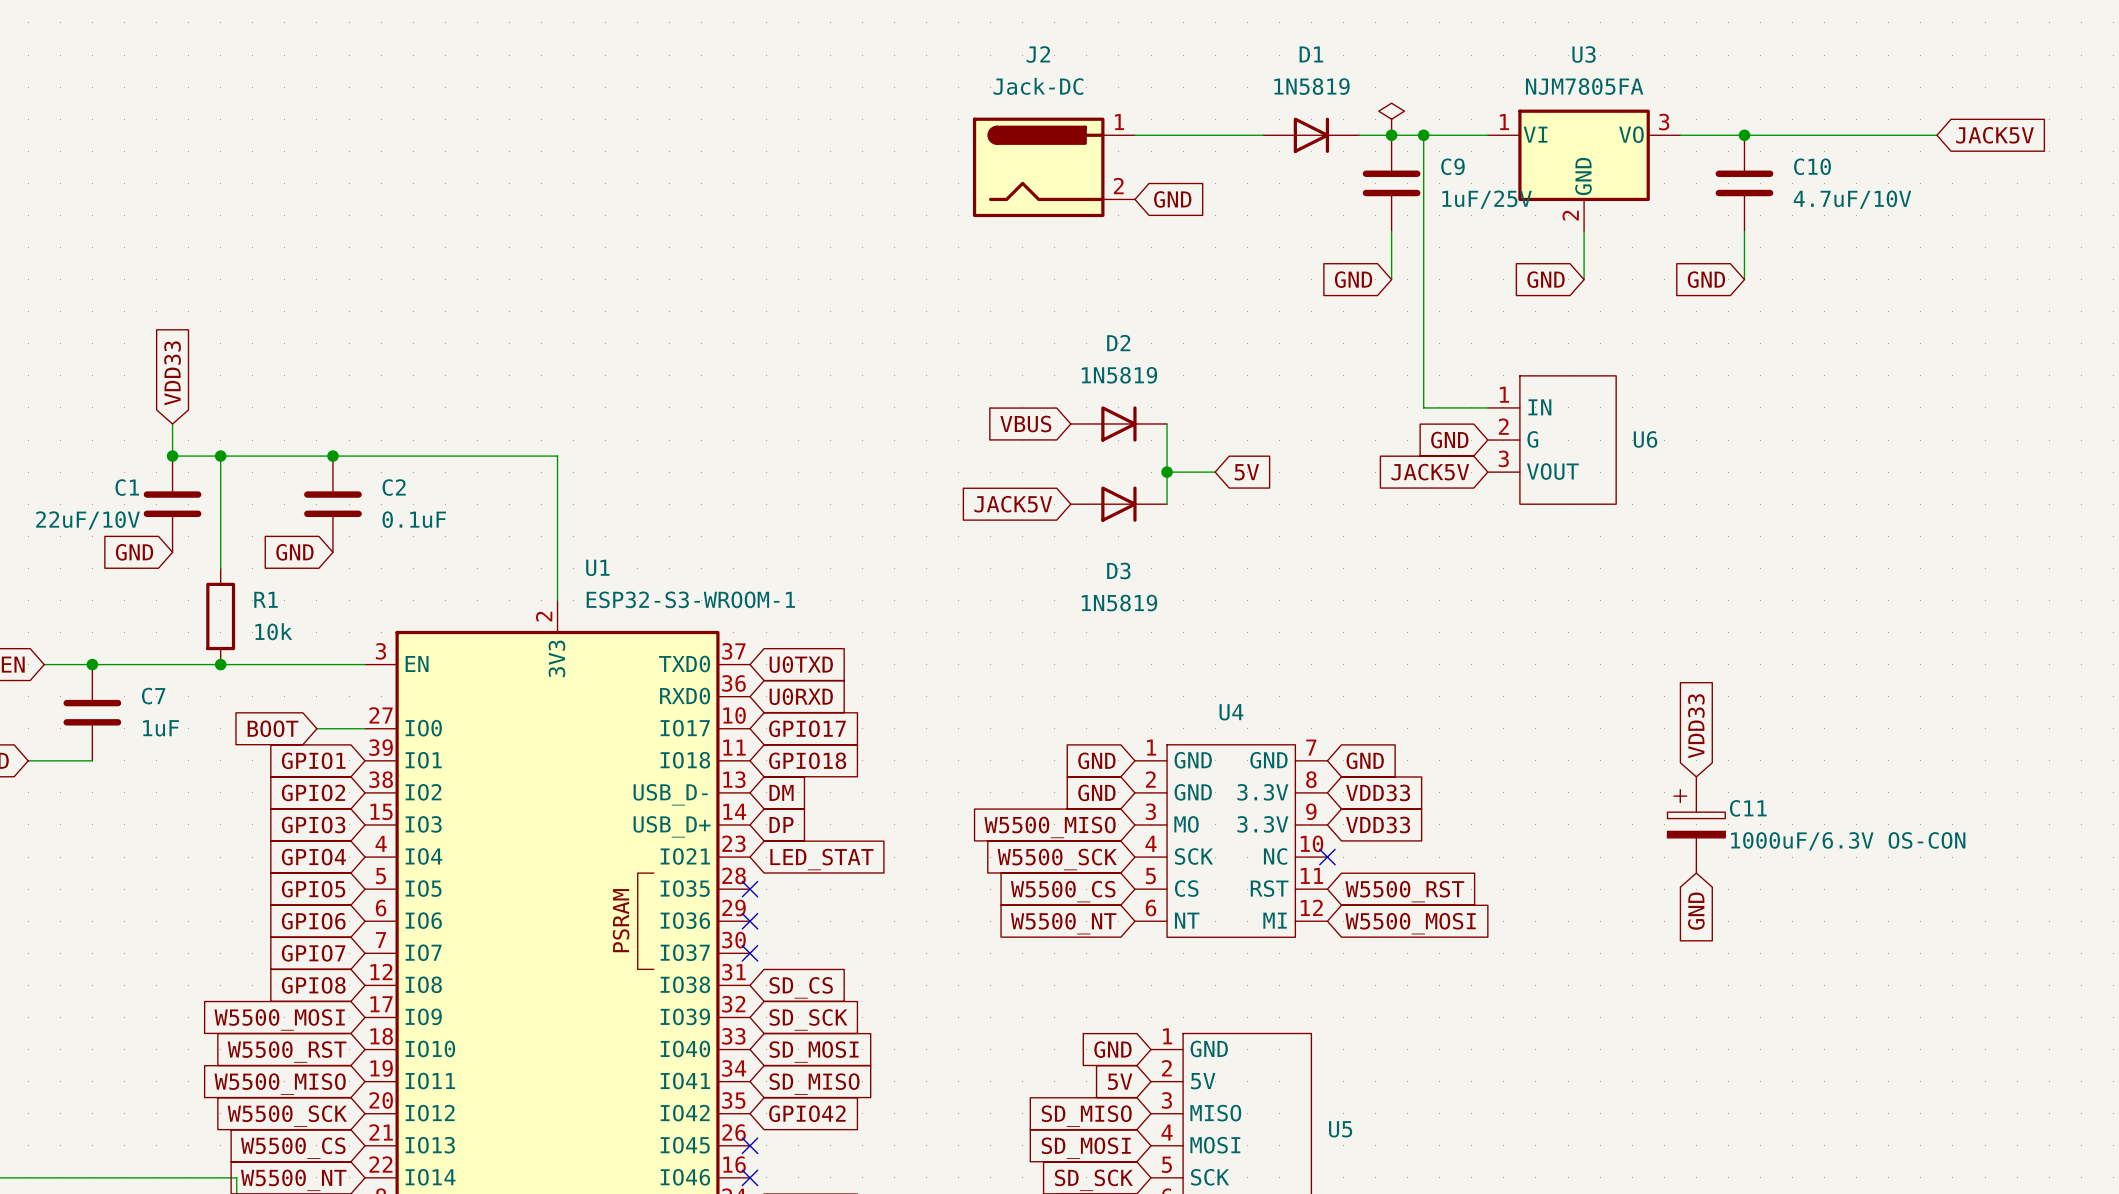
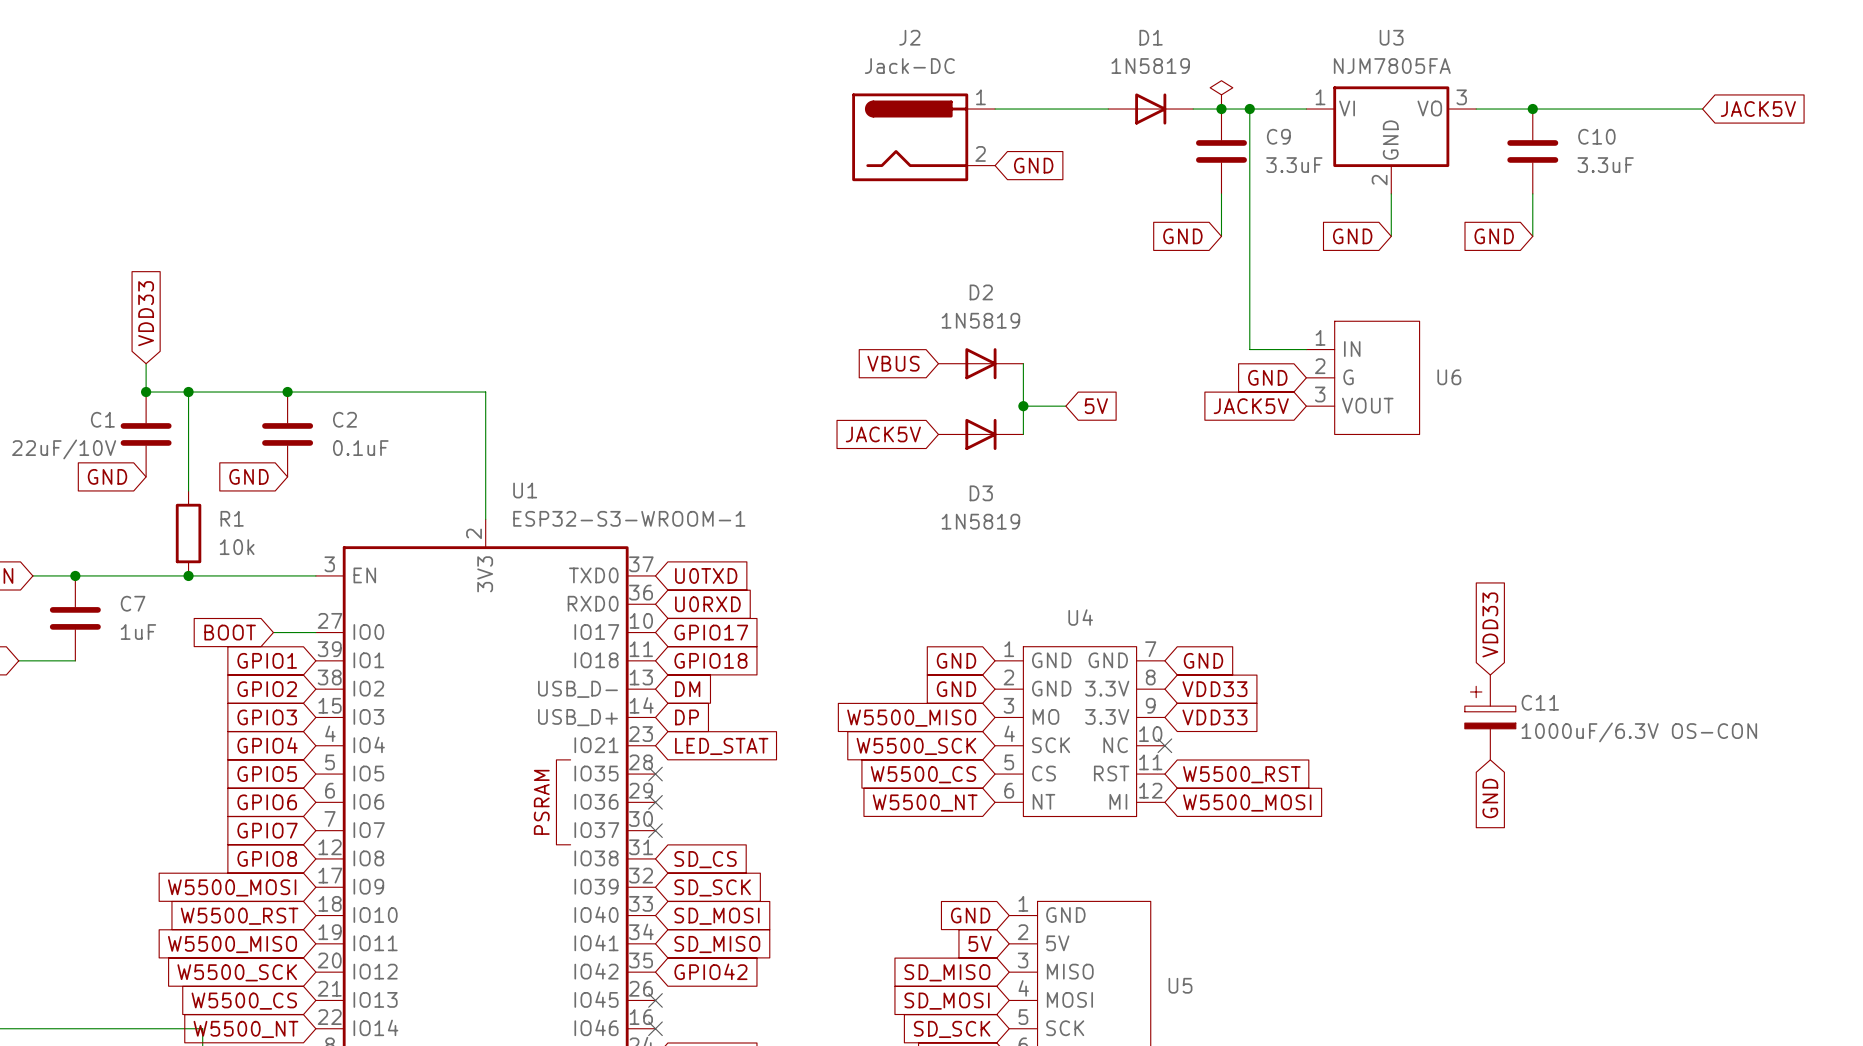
C9 value: 1uF/25V (1487, 199) -> 3.3uF (1294, 165)
C10 value: 4.7uF/10V (1852, 199) -> 3.3uF (1605, 165)

